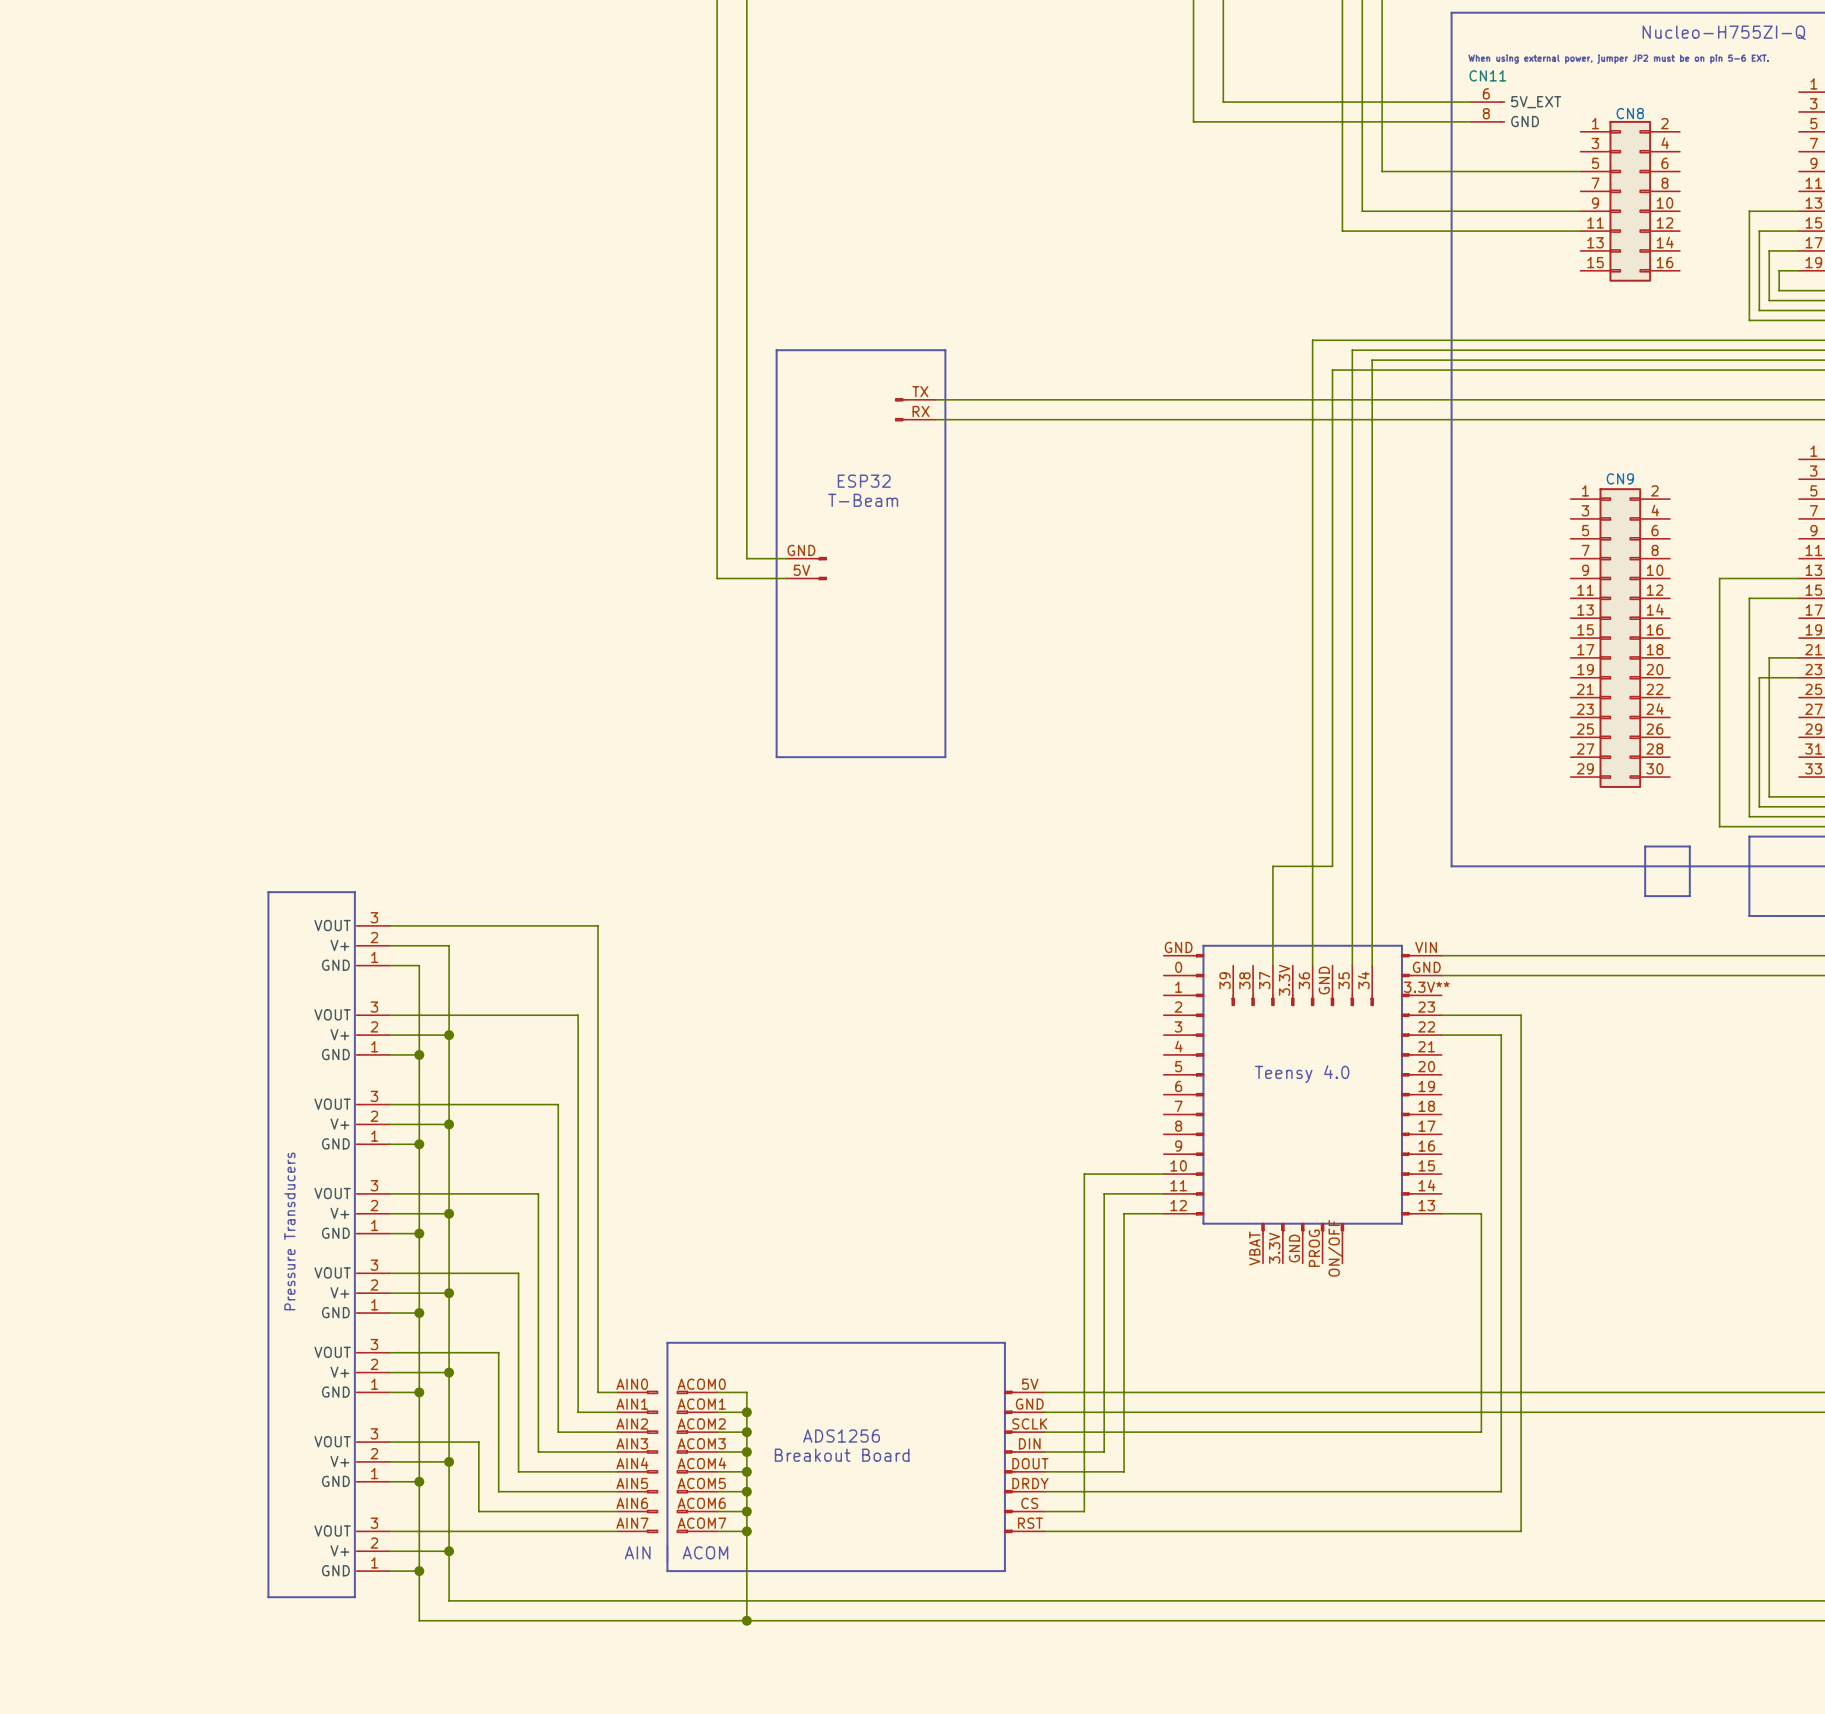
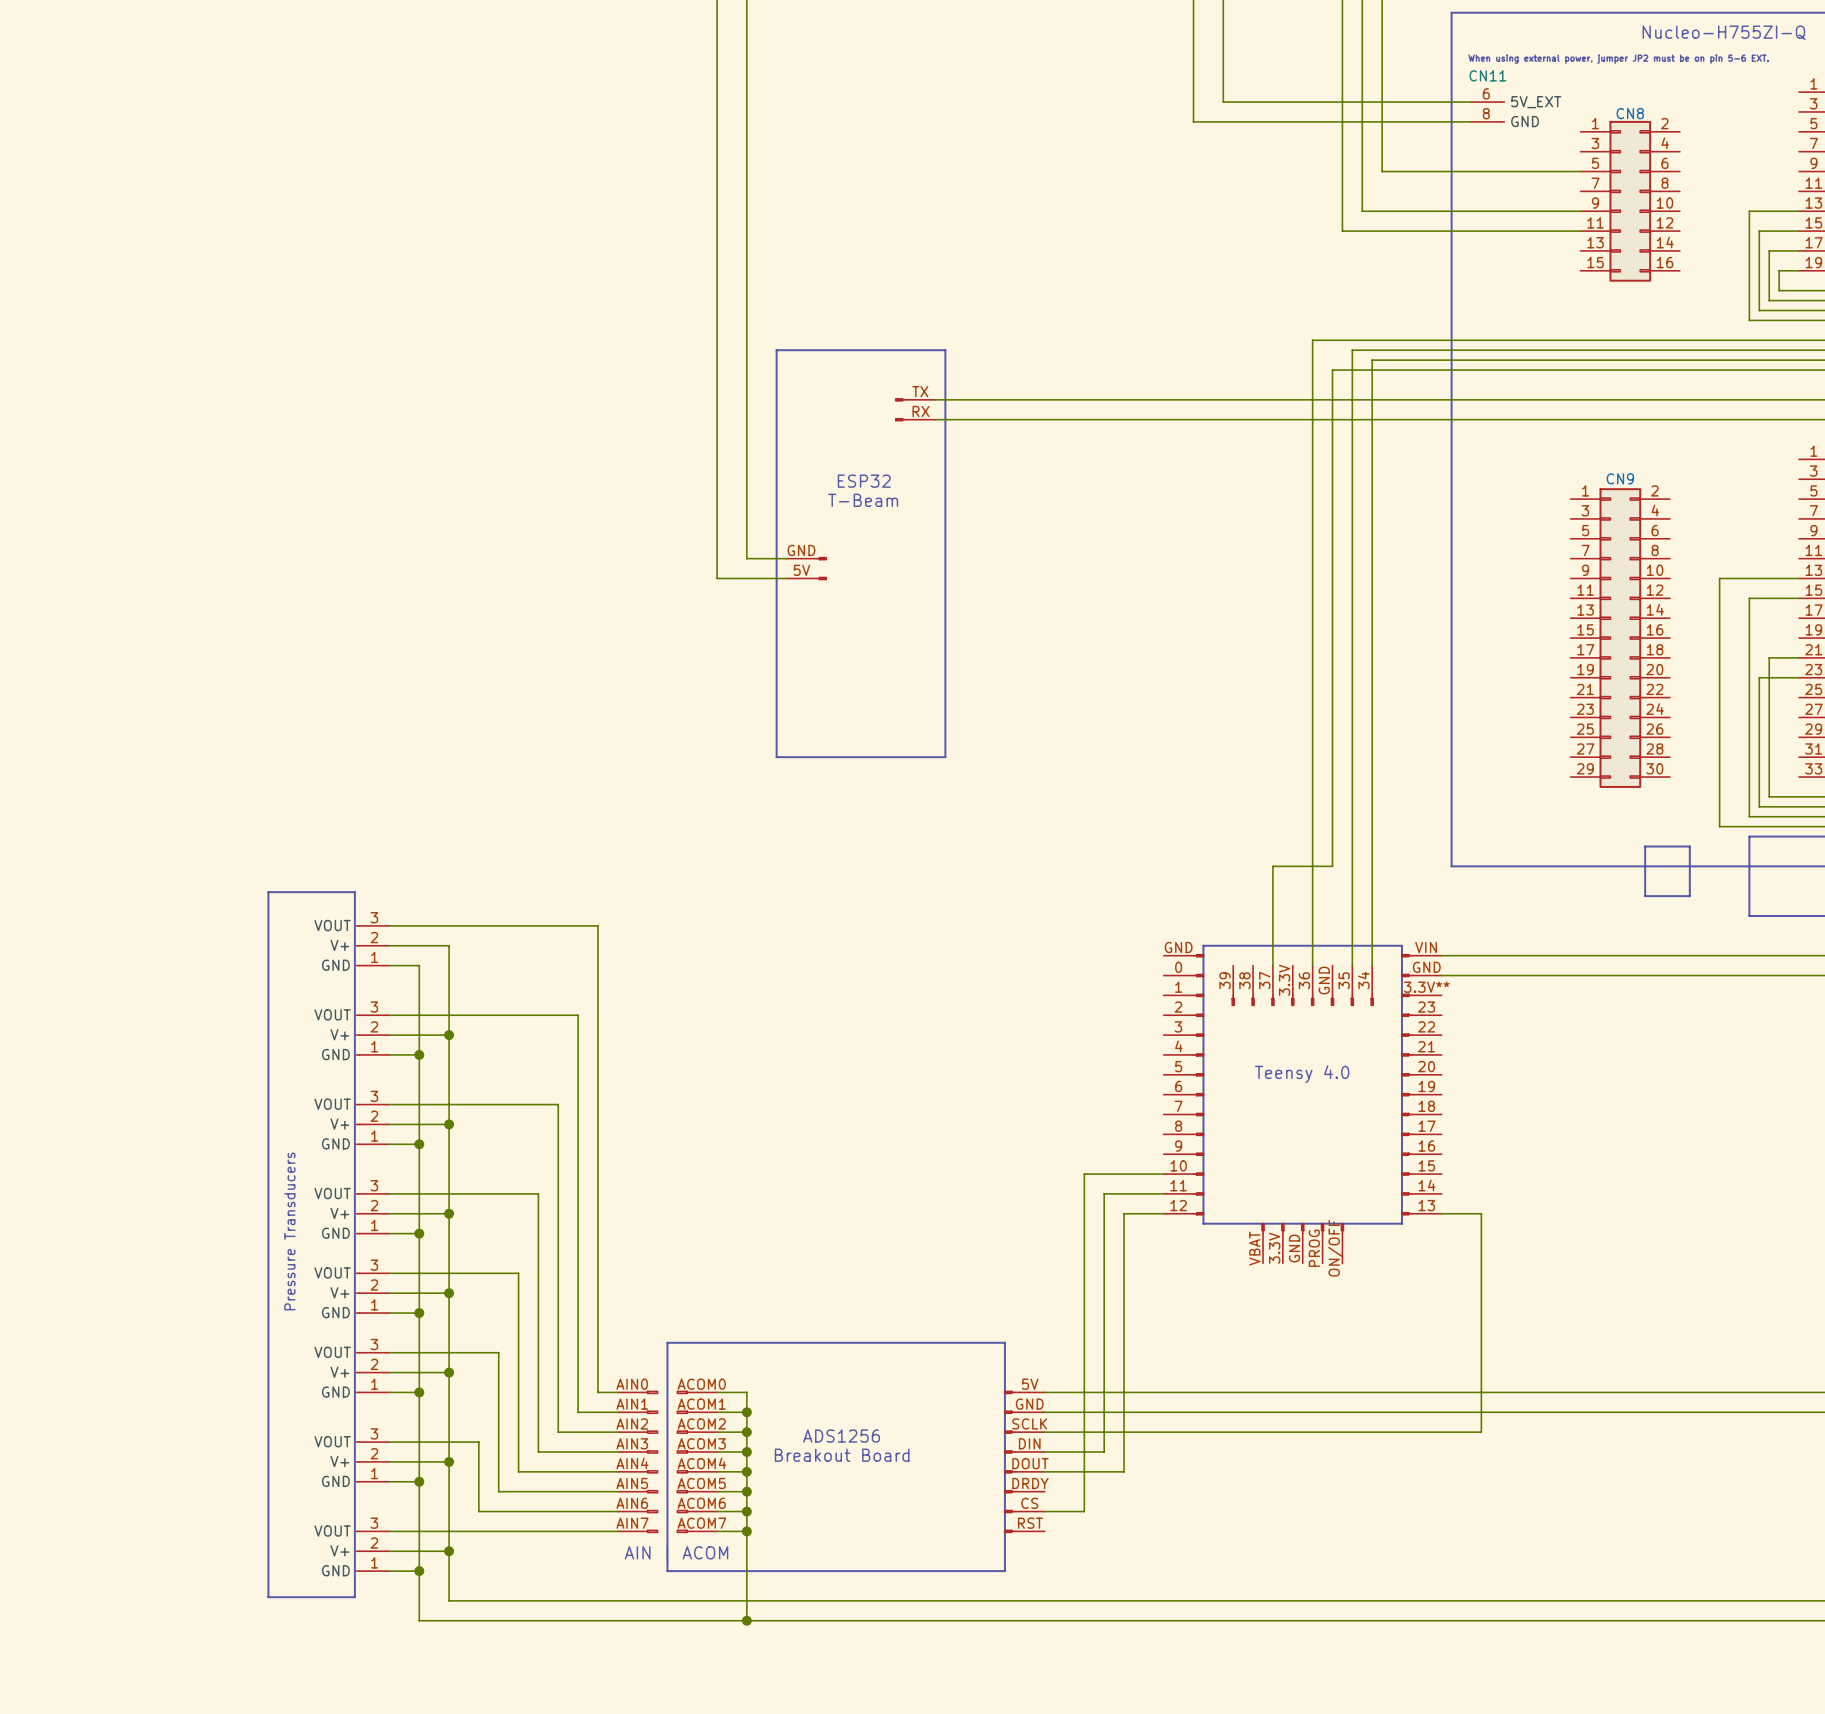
wire: (1441, 1015) (1521, 1015) (1521, 1531) (1044, 1531) -> none
wire: (1441, 1035) (1501, 1035) (1501, 1491) (1044, 1491) -> none

